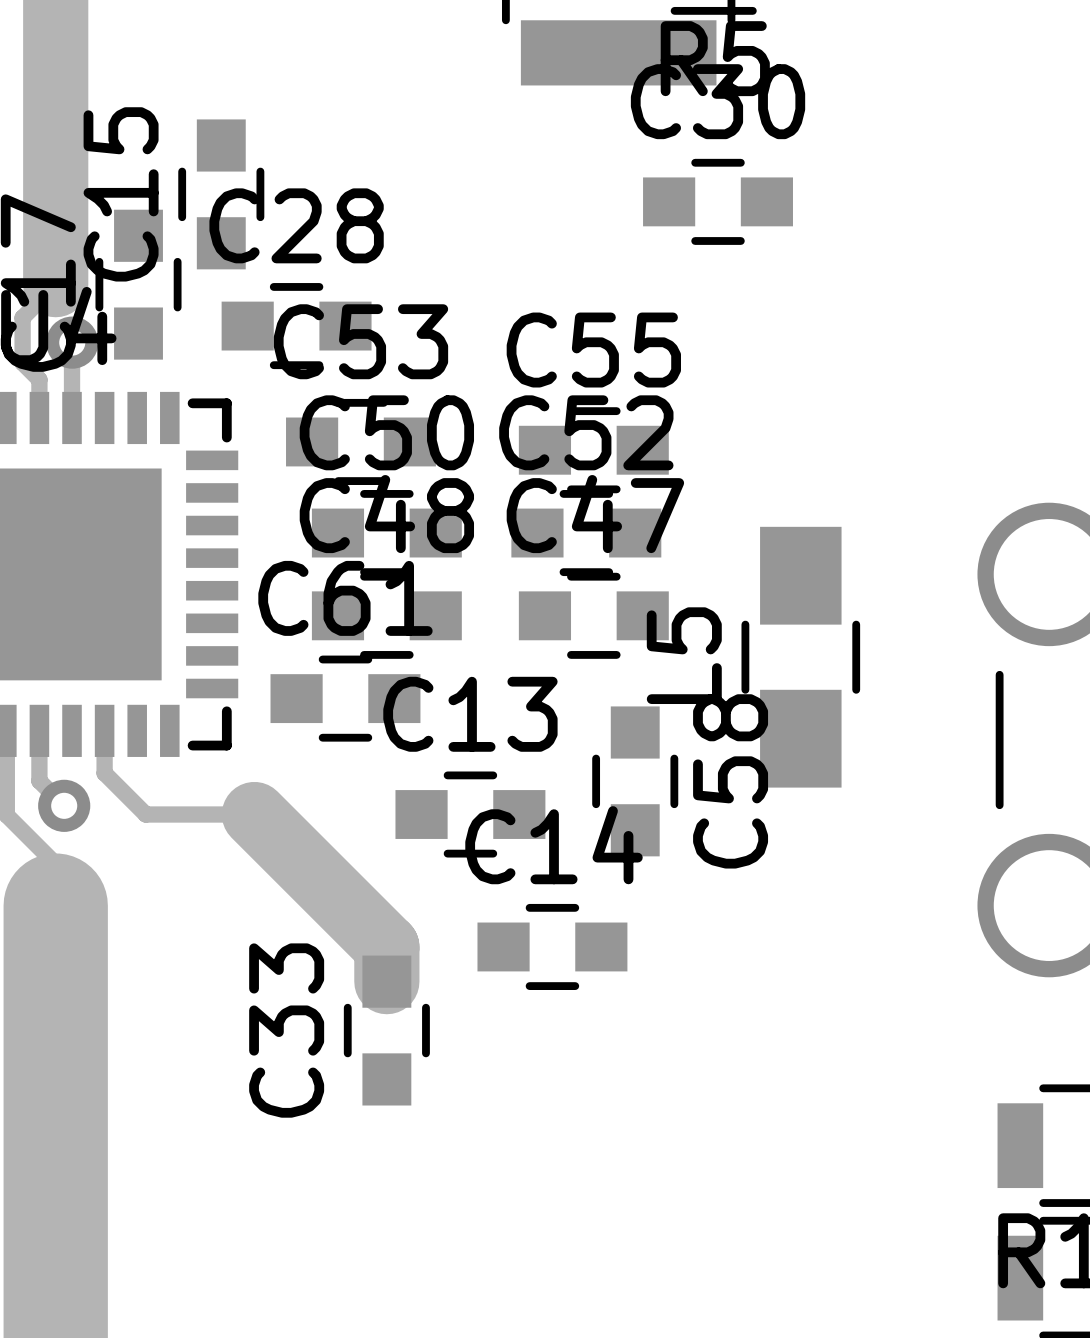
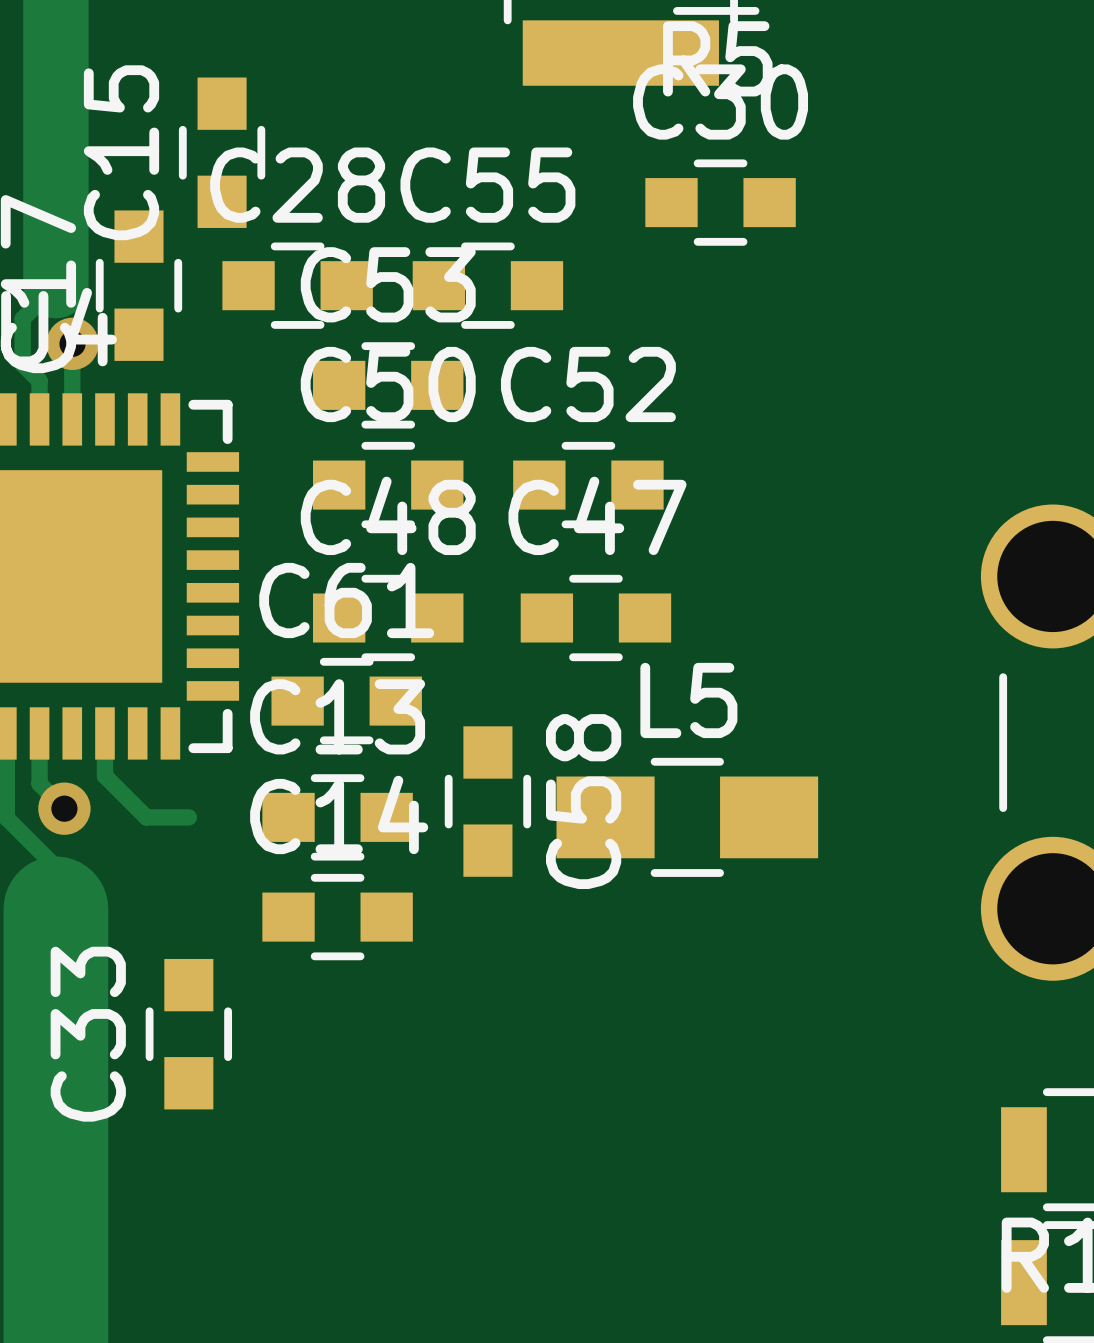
C15 position: (221, 194) -> (222, 152)
C28 position: (296, 326) -> (297, 285)
C53 position: (360, 441) -> (388, 385)
C55 position: (593, 450) -> (487, 285)
C50 position: (386, 533) -> (388, 485)
C52 position: (586, 533) -> (588, 485)
L5 rotation: 0° (800, 657) -> 90° clockwise (687, 817)
L5 position: (800, 657) -> (687, 817)
C58 position: (635, 781) -> (487, 801)
track: (188, 814) (254, 814) (386, 946) (386, 981) -> none
C13 position: (470, 814) -> (337, 817)
C14 position: (552, 946) -> (337, 917)
C33 position: (386, 1030) -> (188, 1034)

